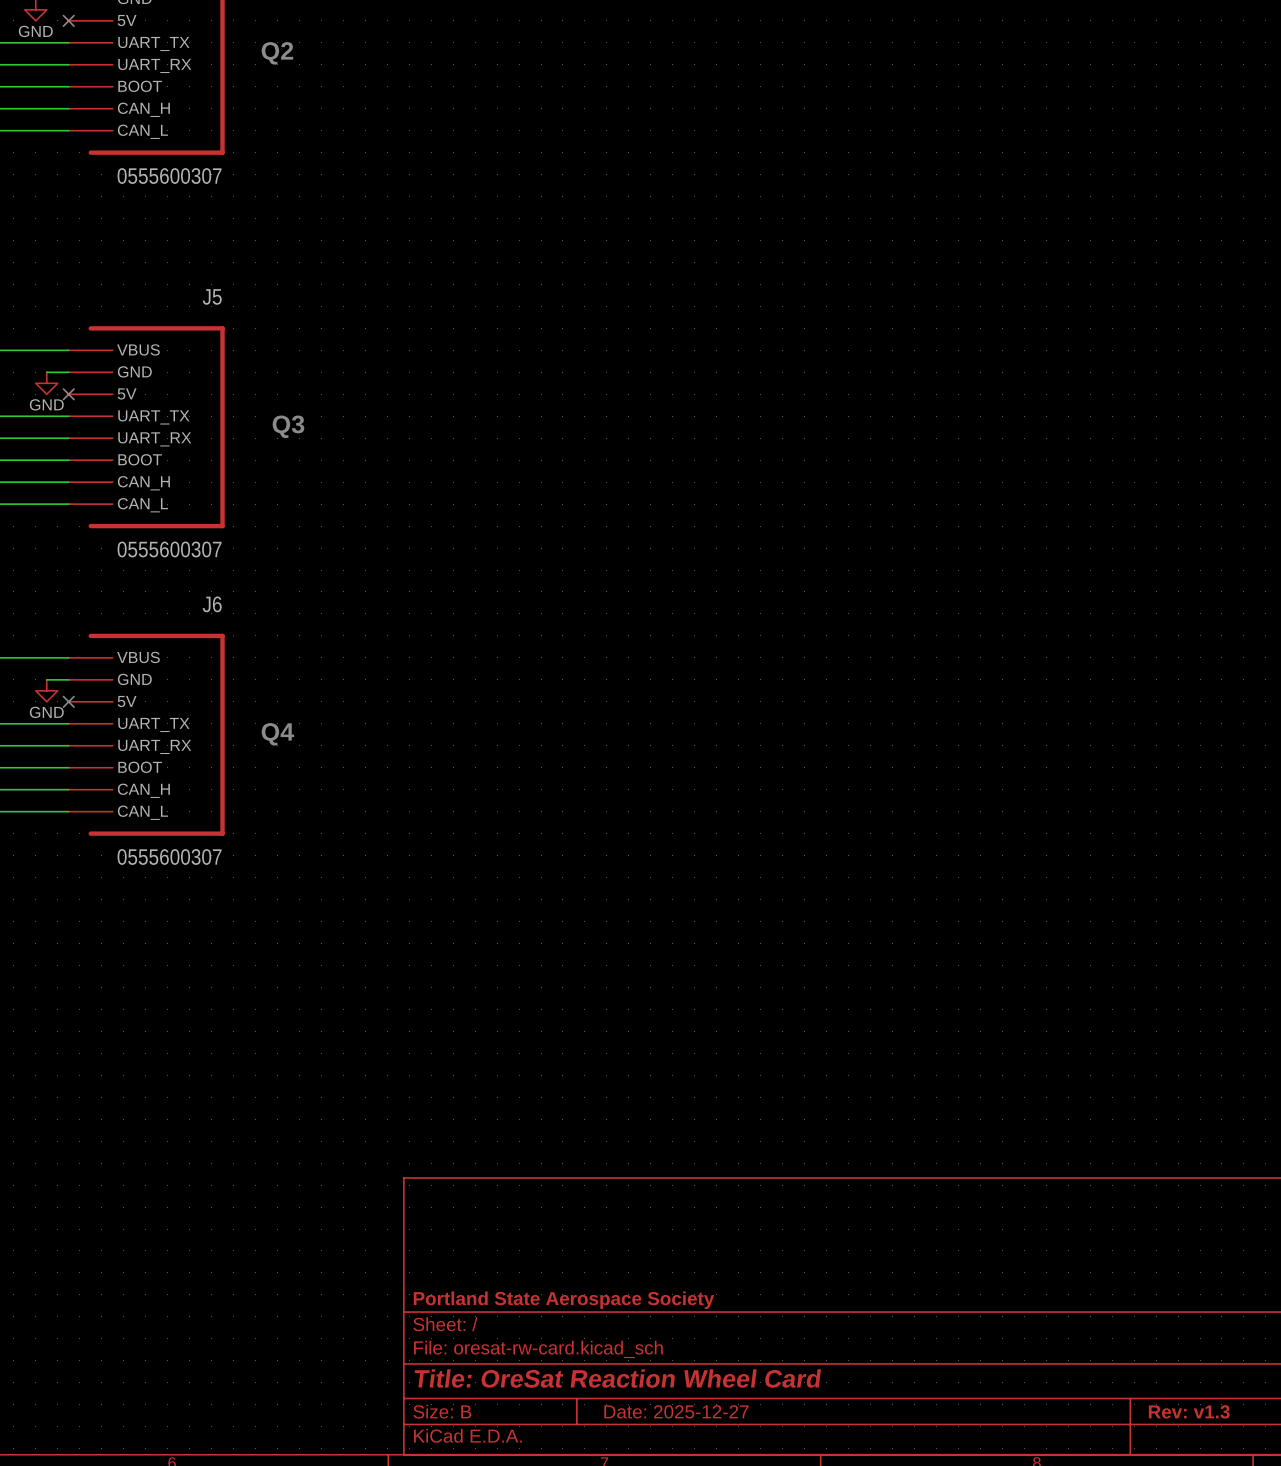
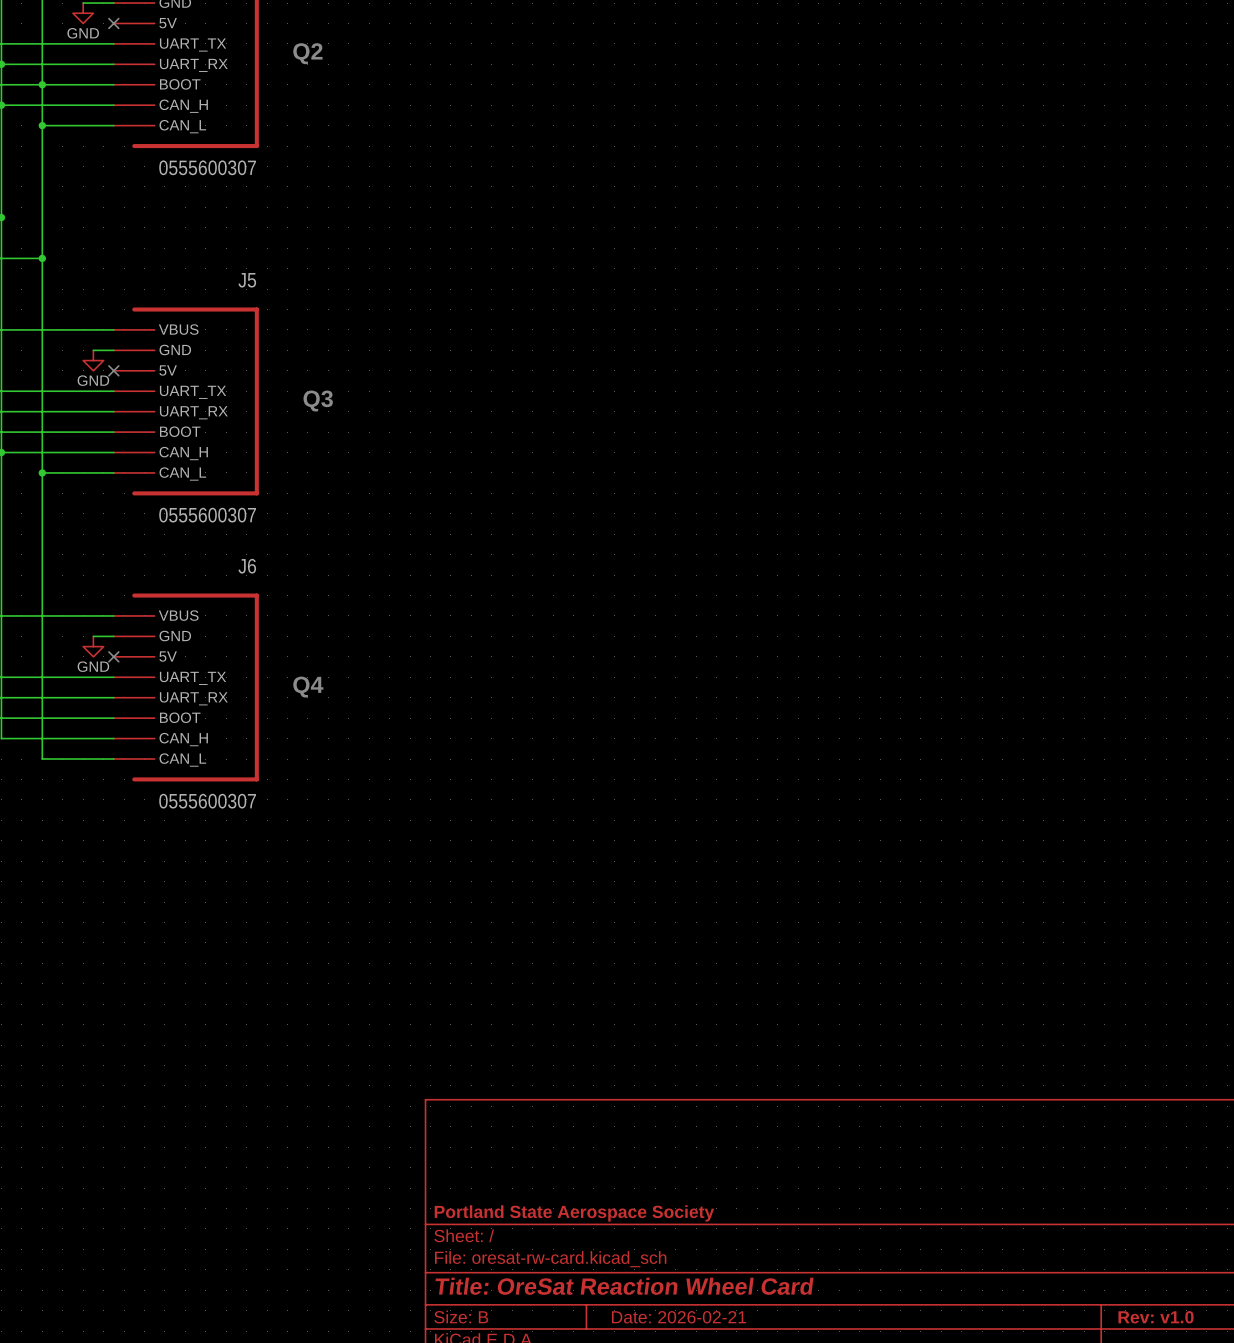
title block: Date: 2025-12-27 (676, 1411) -> Date: 2026-02-21 (679, 1317)
title block: Rev: v1.3 (1189, 1411) -> Rev: v1.0 (1156, 1317)

